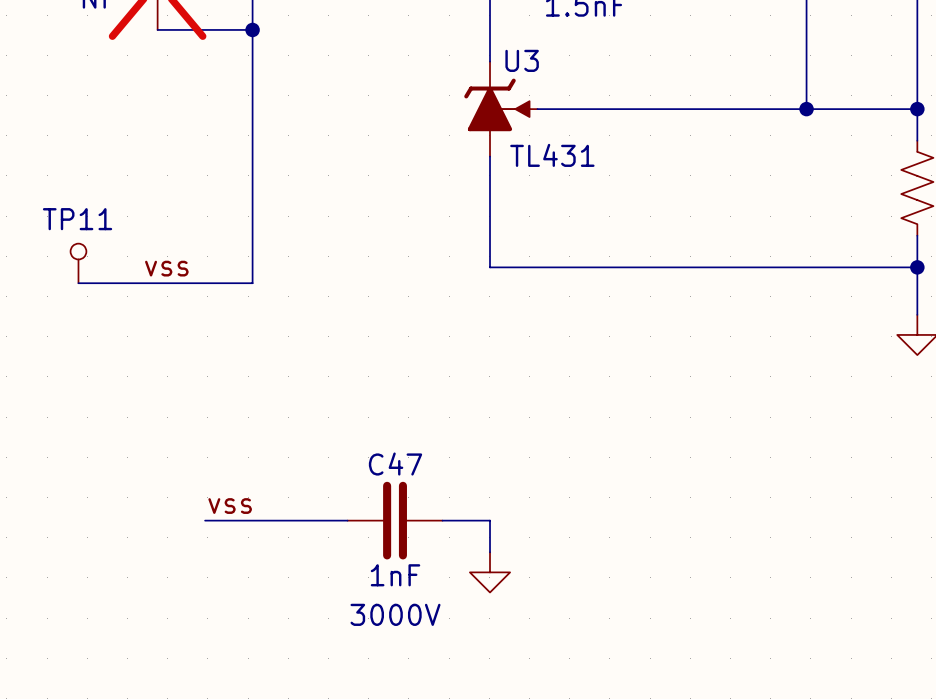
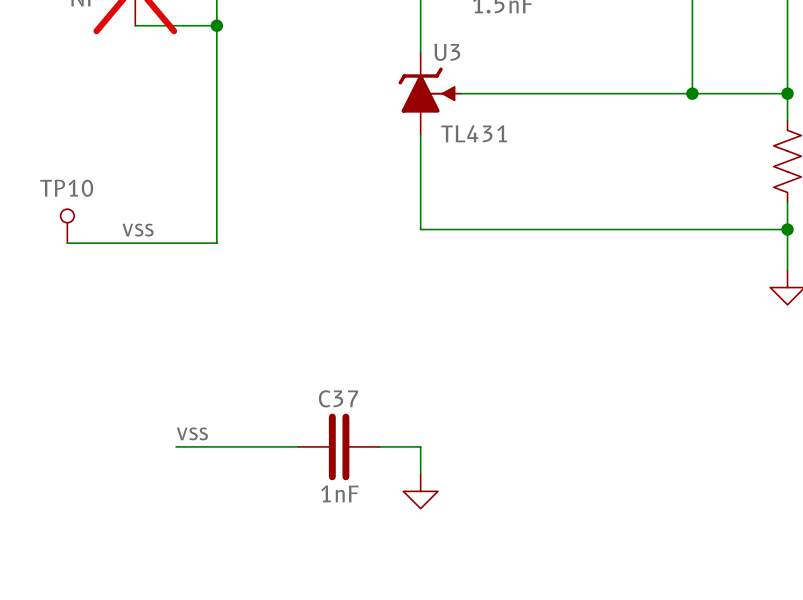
TP11 name: TP11 (77, 219) -> TP10 (66, 188)
C47 name: C47 (395, 464) -> C37 (338, 398)
C47 text: 3000V (395, 614) -> none

